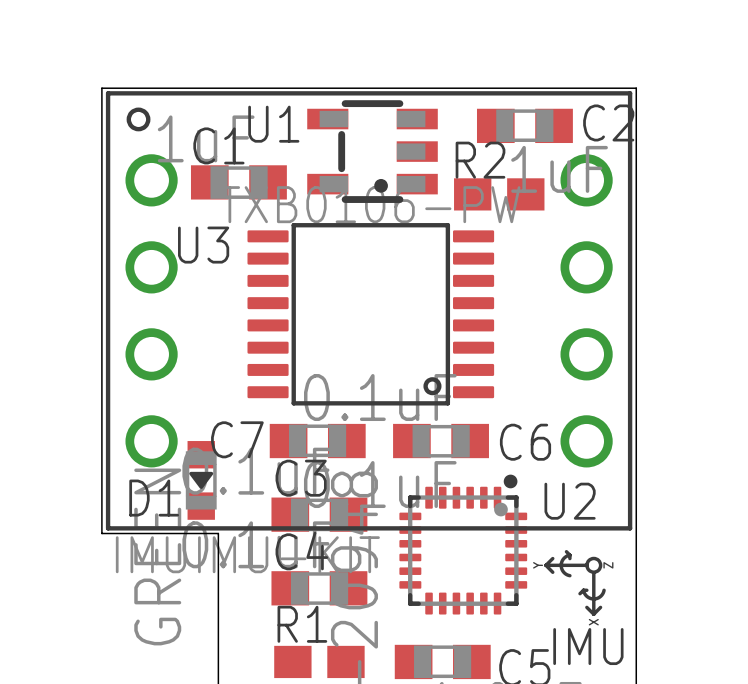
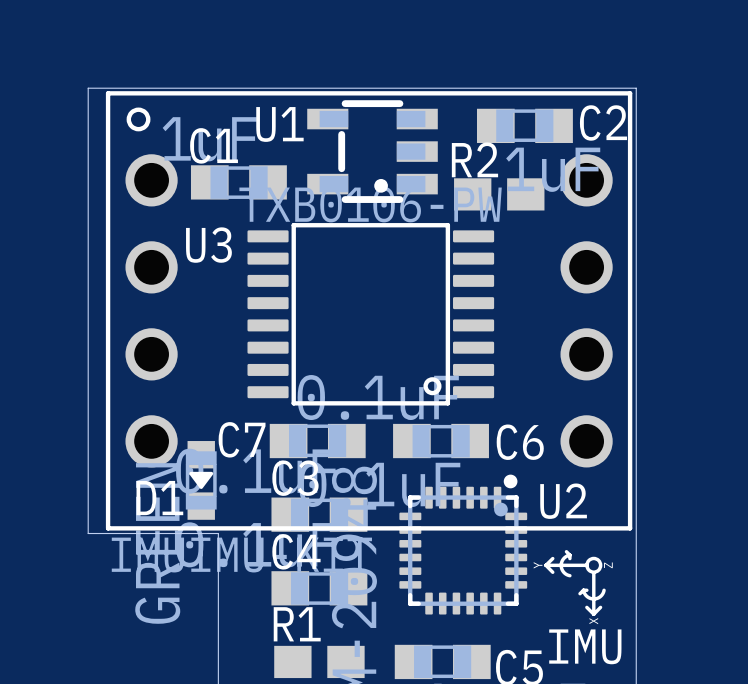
board edge: (101, 88) (101, 533) -> (101, 88) (88, 88) (88, 533) (101, 533)

